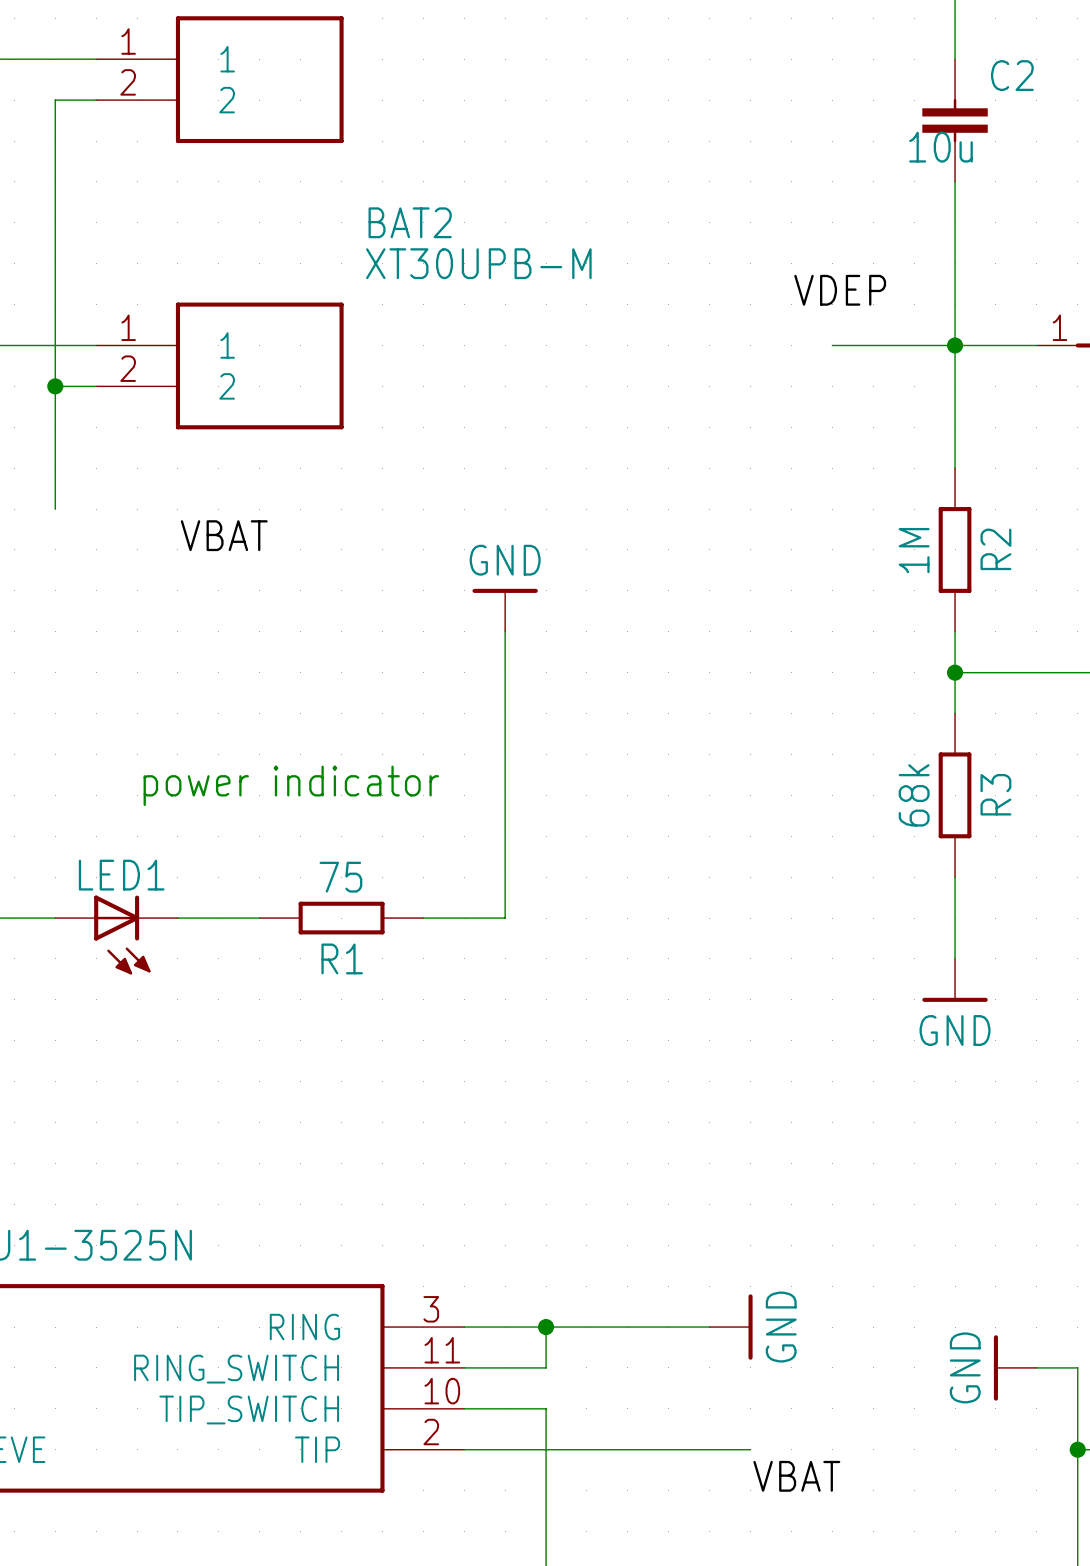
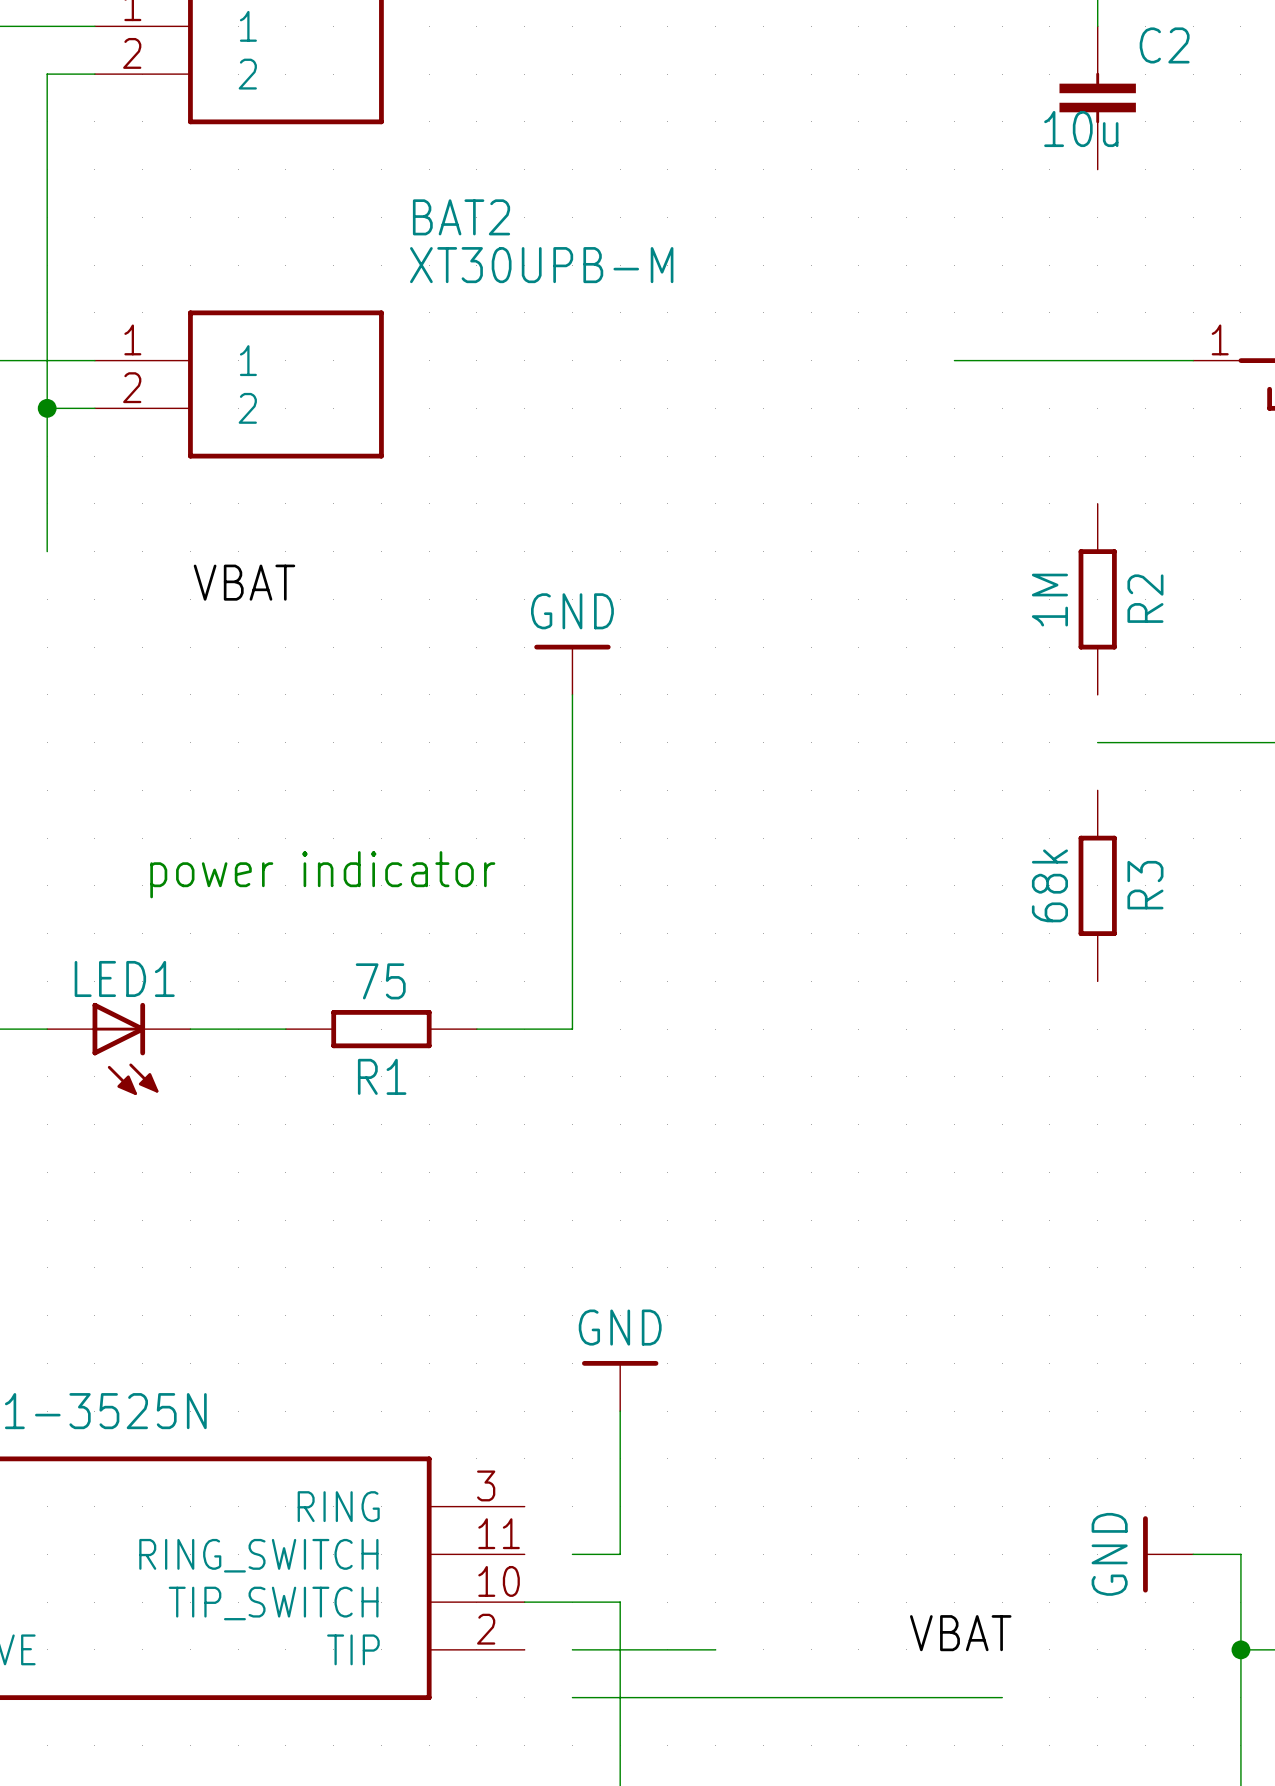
wire: (955, 181) (955, 468) -> none
label: VDEP (840, 290) -> none
junction: (955, 345) -> none
wire: (955, 631) (955, 713) -> none
junction: (955, 672) -> none
wire: (955, 877) (955, 958) -> none
power symbol: GND (955, 980) -> none
wire: none -> (620, 1411) (620, 1506)
wire: (464, 1327) (709, 1327) -> none
junction: (546, 1327) -> none
power symbol position: GND (731, 1327) -> GND (620, 1386)
power symbol rotation: 0° (750, 1327) -> 90° counterclockwise (620, 1363)
wire: (464, 1367) (505, 1367) -> none
wire: (464, 1449) (505, 1449) -> none
wire: (627, 1449) (750, 1449) -> none
label position: VBAT (796, 1476) -> VBAT (960, 1633)
wire: none -> (572, 1697) (1002, 1697)

